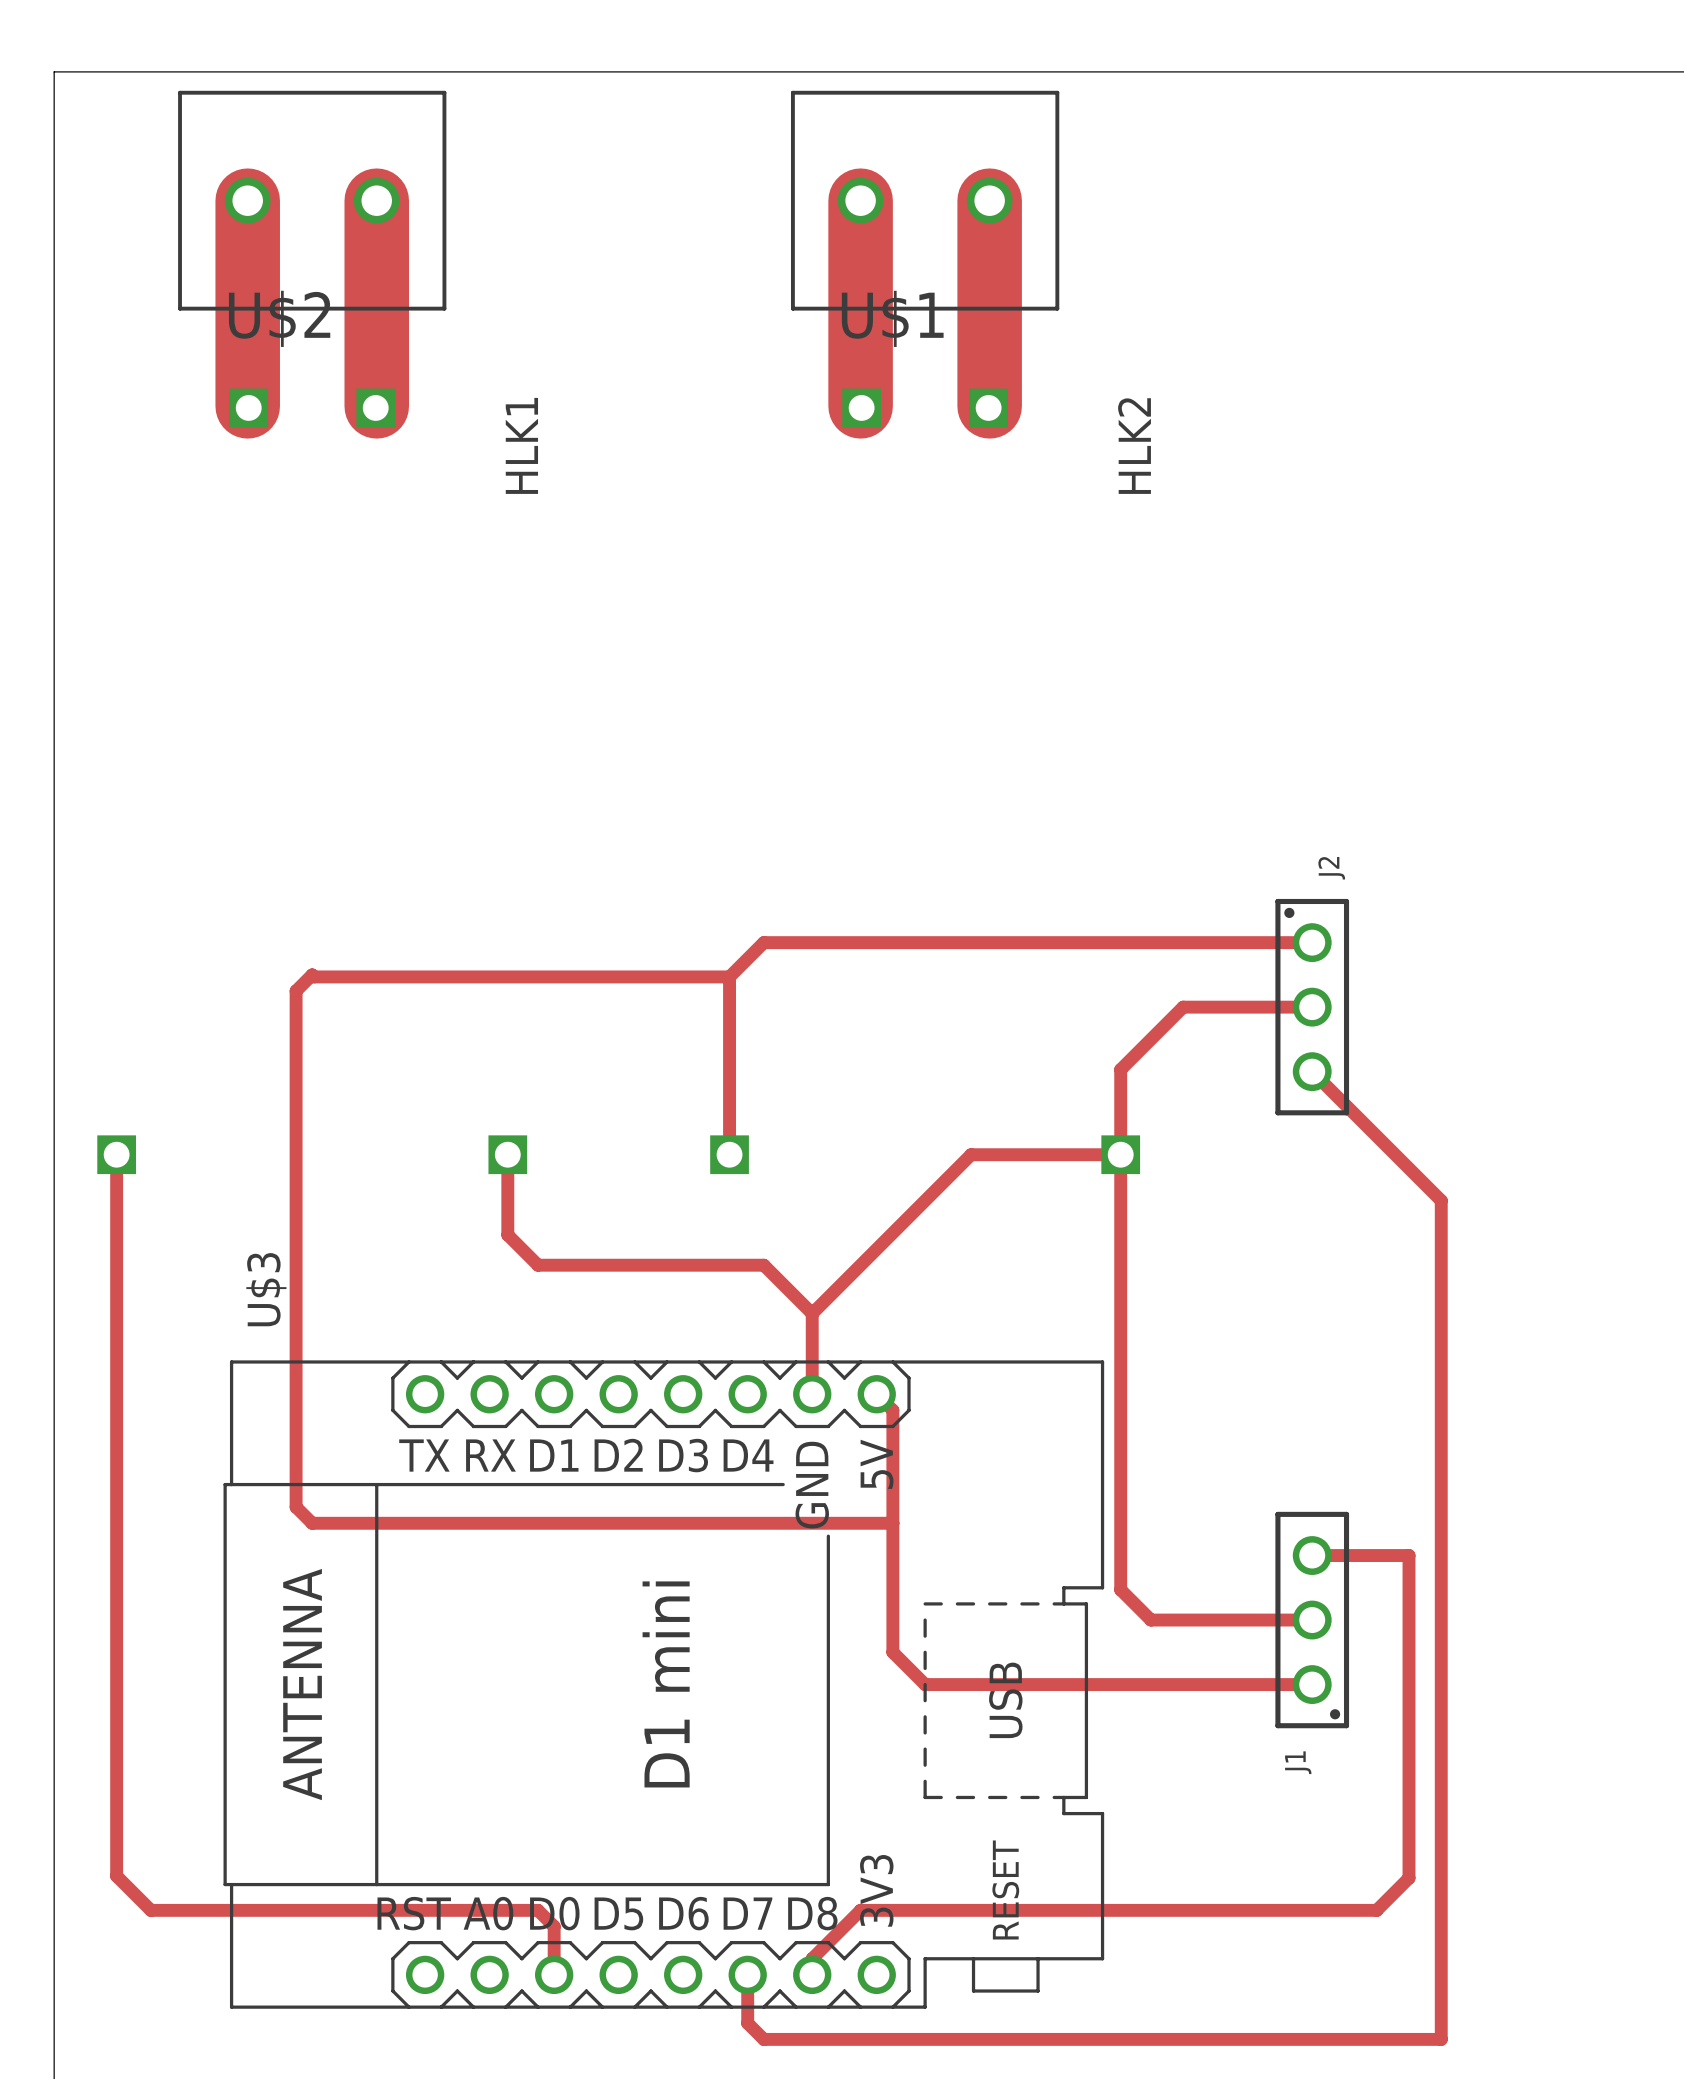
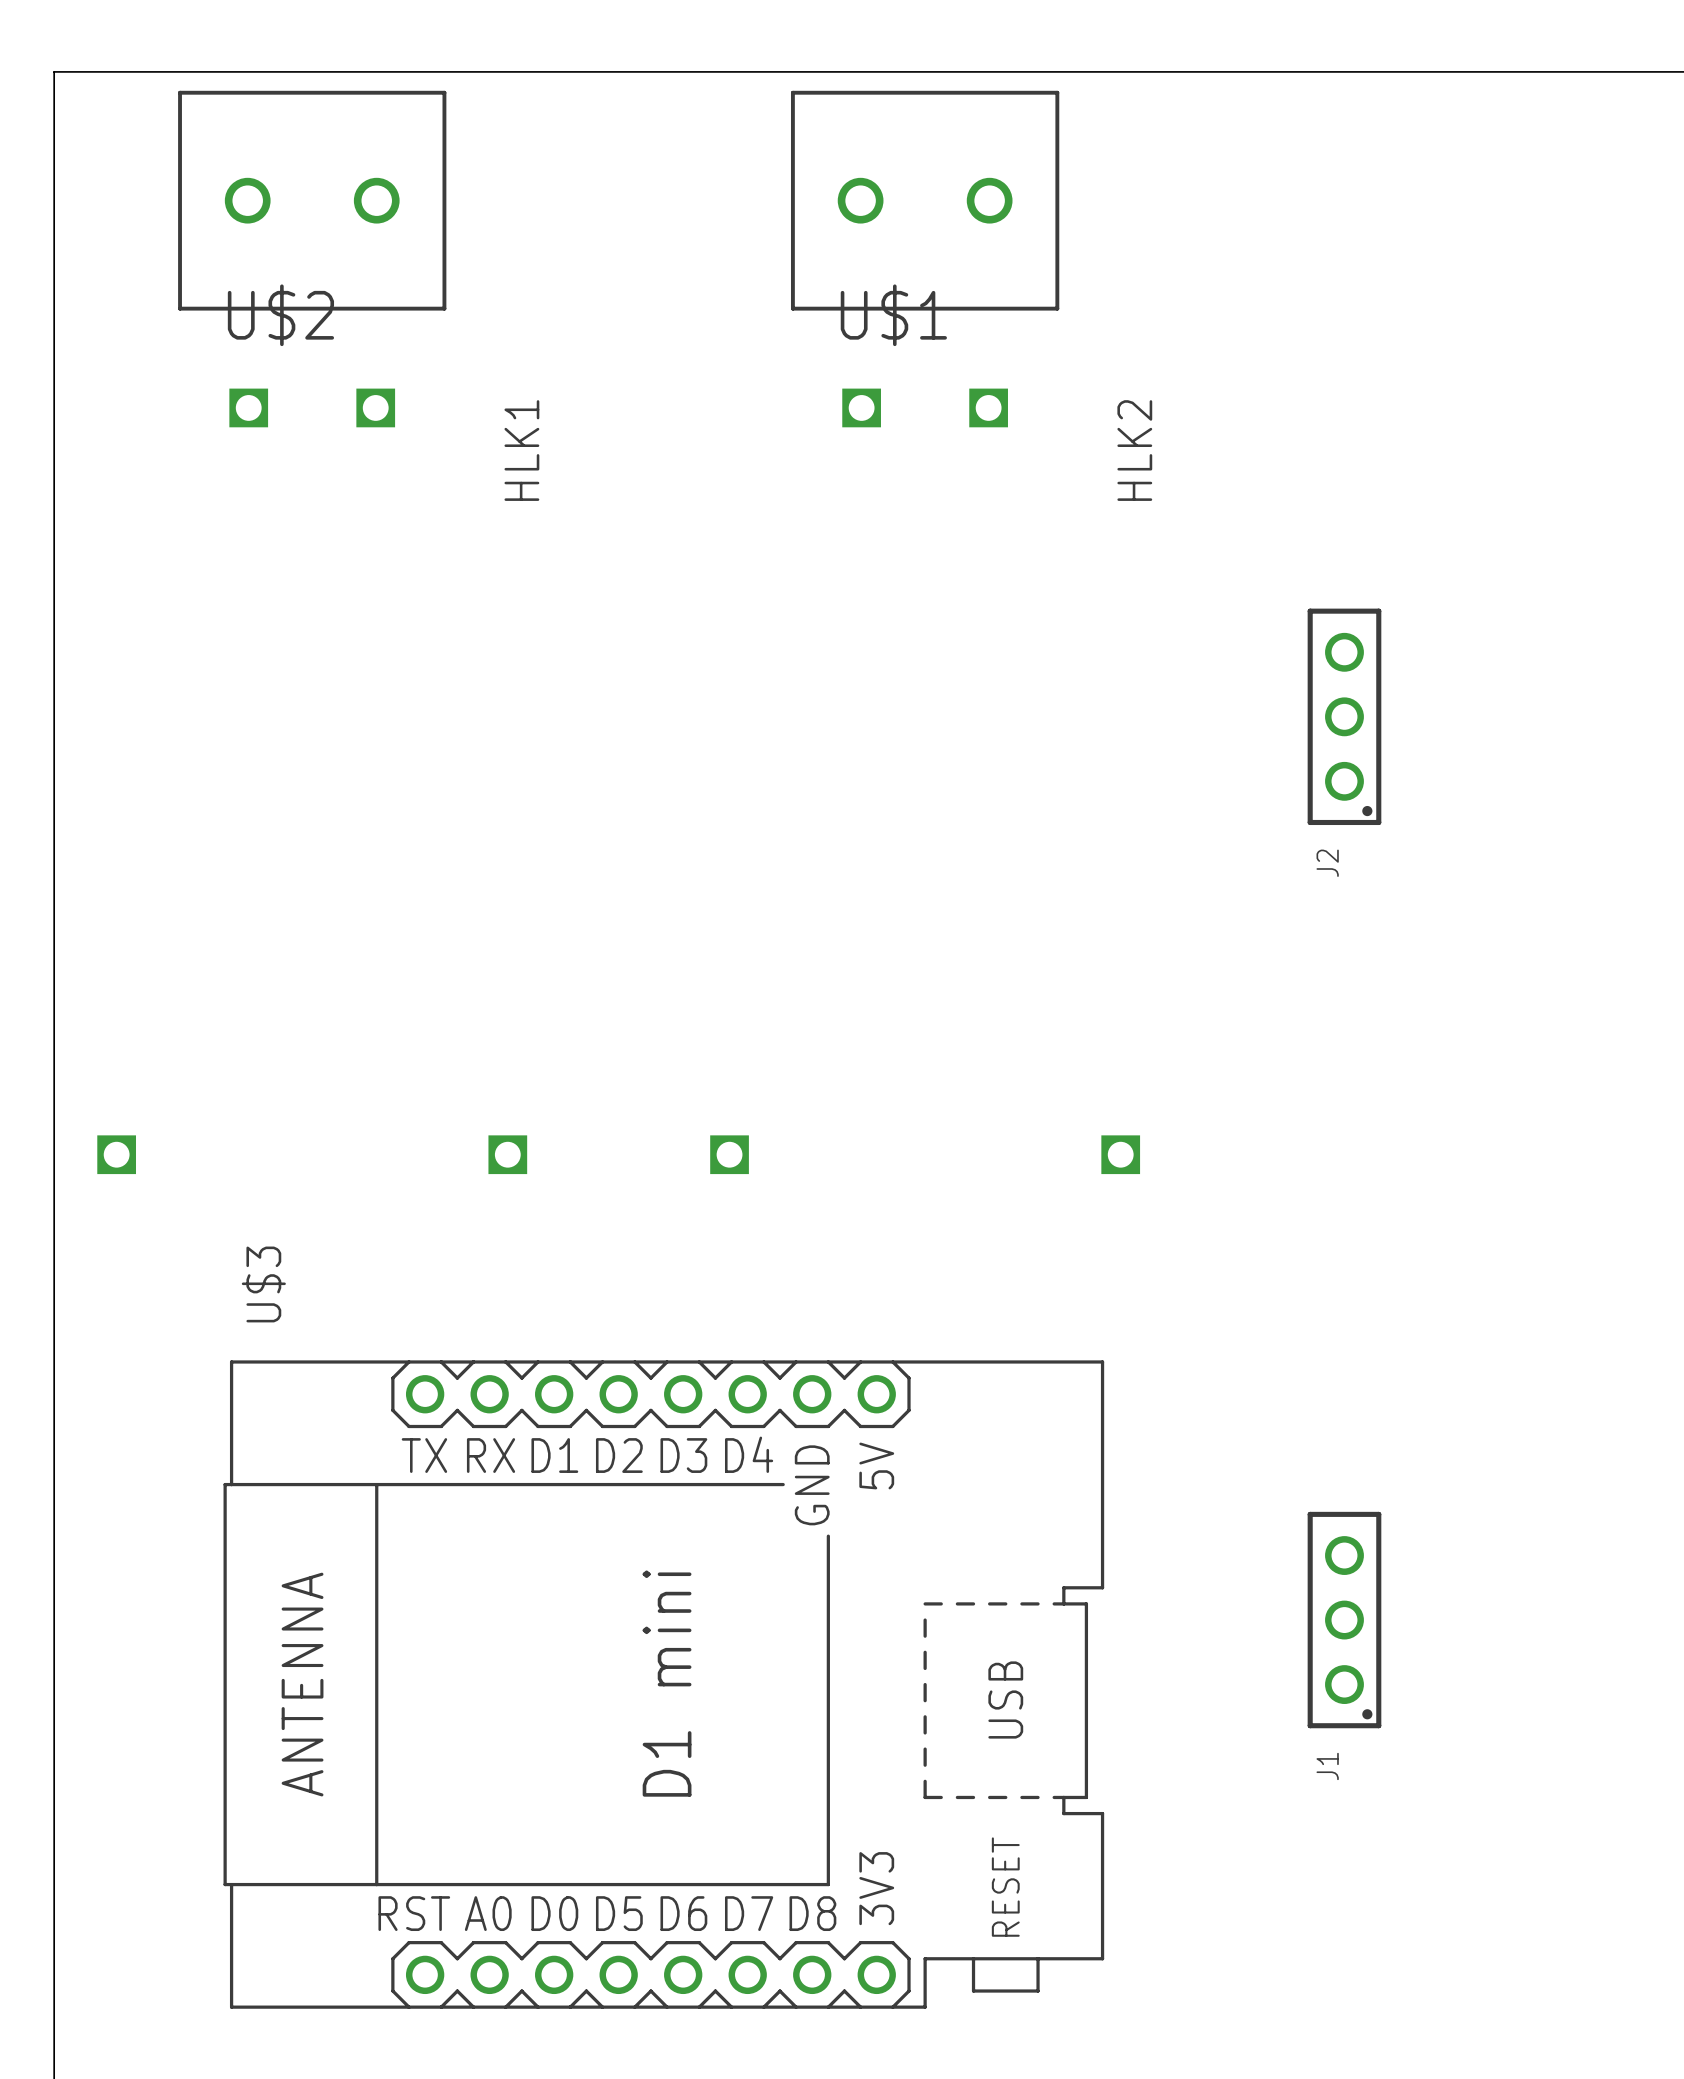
top track: (247, 200) (248, 407) -> none
top track: (376, 200) (375, 407) -> none
top track: (860, 200) (861, 407) -> none
top track: (989, 200) (988, 407) -> none
top track: (1312, 942) (763, 942) (729, 976) -> none
top track: (729, 976) (729, 1154) -> none
top track: (729, 976) (314, 976) (312, 974) (296, 991) (296, 1507) (312, 1523) (892, 1523) -> none
top track: (1312, 1007) (1183, 1007) (1120, 1069) (1120, 1589) (1150, 1620) (1312, 1620) -> none
J2 rotation: 0° (1312, 1007) -> 180° (1344, 716)
J2 position: (1312, 1007) -> (1344, 716)
top track: (1312, 1071) (1441, 1200) (1441, 2039) (763, 2039) (747, 2023) (747, 1974) -> none
top track: (116, 1154) (116, 1876) (150, 1910) (538, 1910) (554, 1926) (554, 1974) -> none
top track: (507, 1154) (507, 1234) (538, 1265) (763, 1265) (812, 1313) -> none
top track: (1120, 1154) (971, 1154) (812, 1313) -> none
top track: (812, 1313) (812, 1394) -> none
top track: (876, 1394) (892, 1410) (892, 1652) (925, 1684) (1312, 1684) -> none
top track: (1312, 1555) (1409, 1555) (1409, 1878) (1376, 1910) (860, 1910) (812, 1958) (812, 1974) -> none
J1 position: (1312, 1620) -> (1344, 1620)

